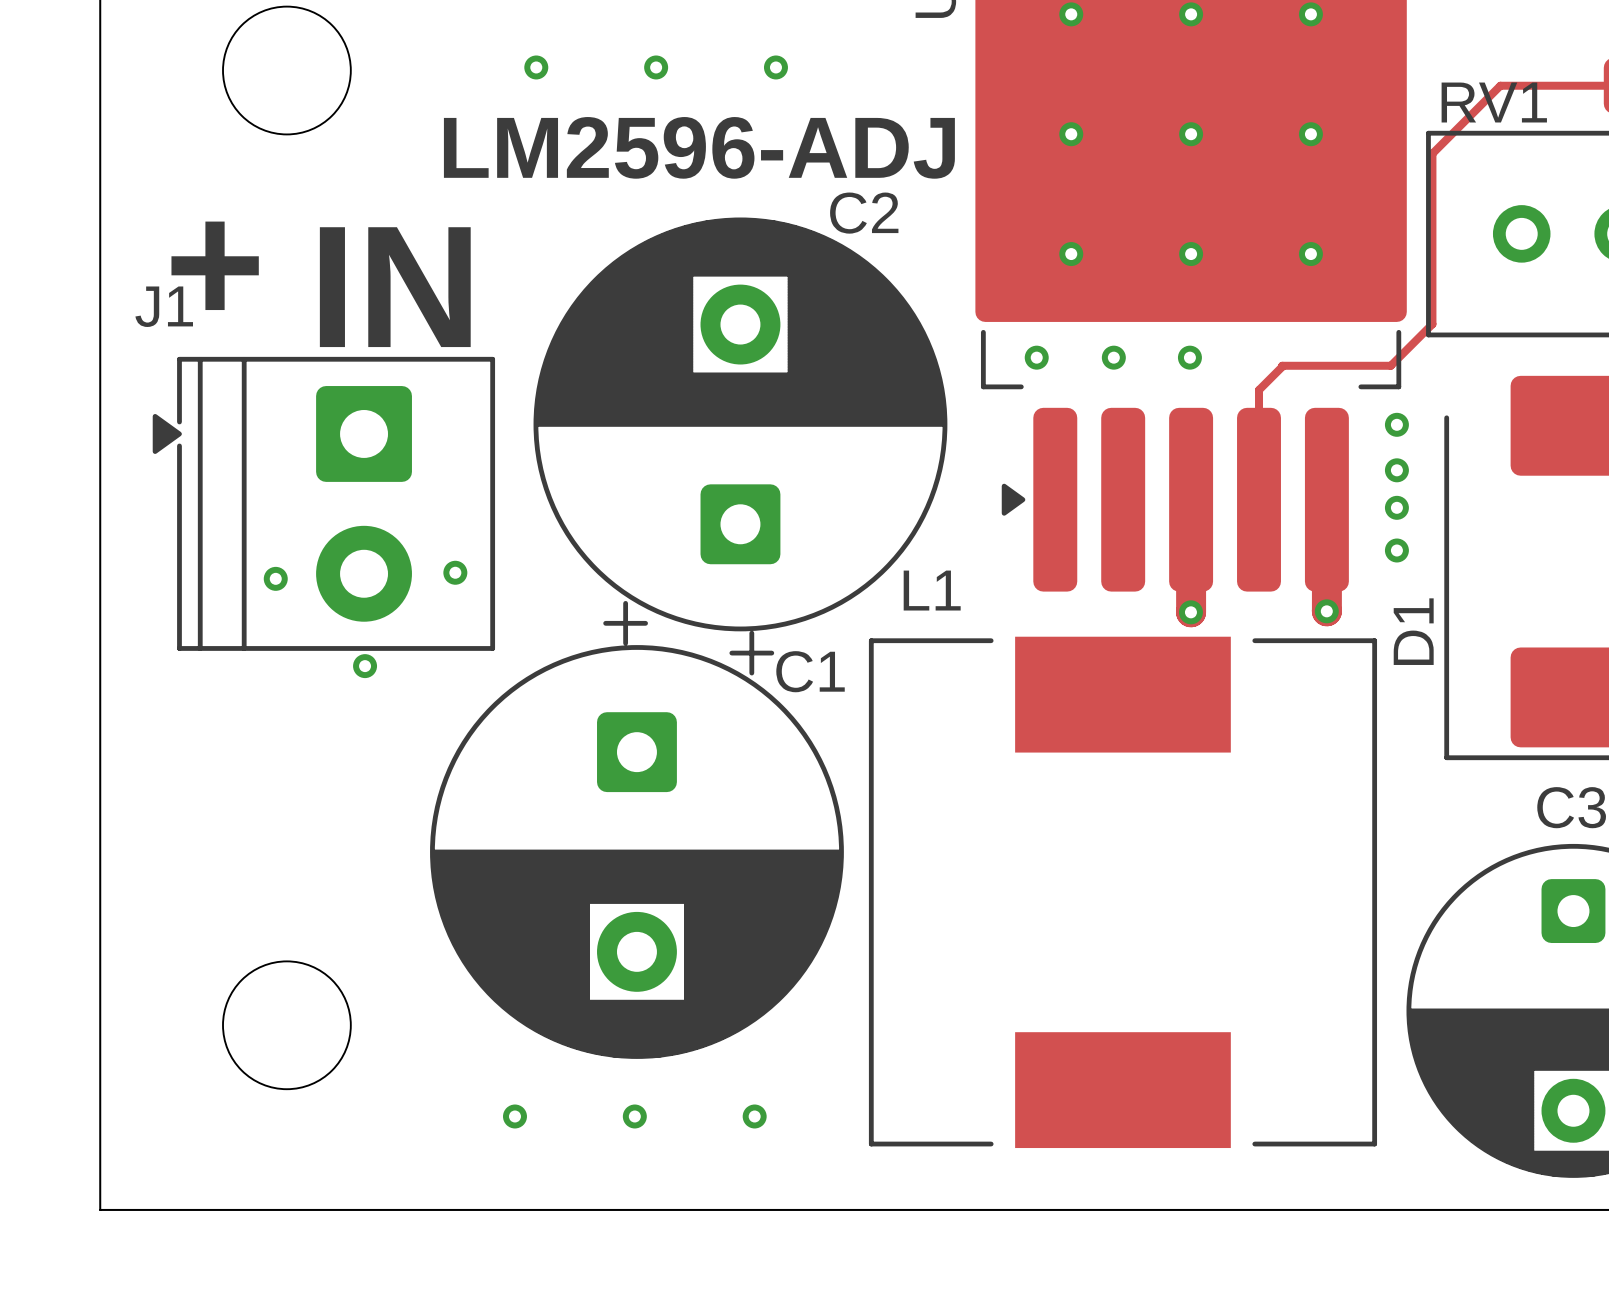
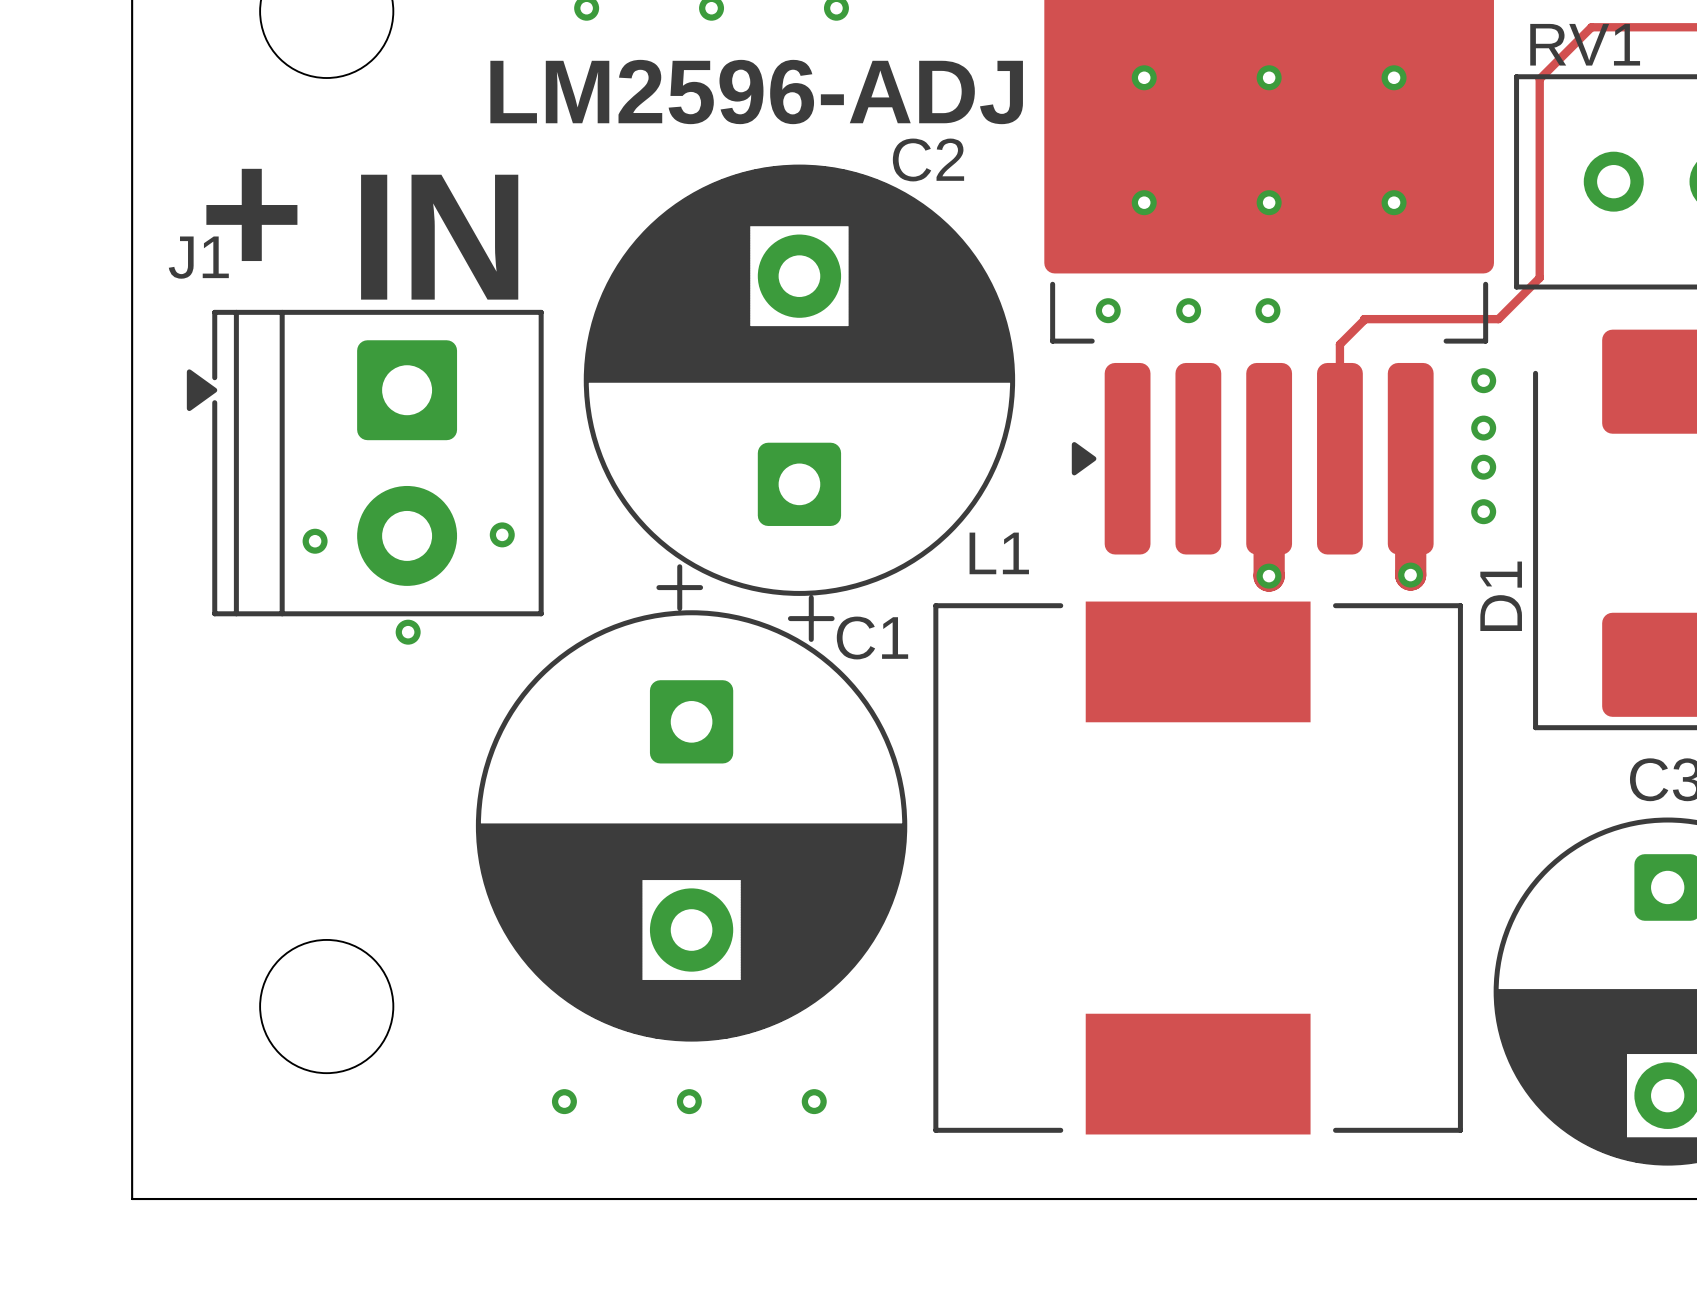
track: (1450, 135) (1432, 153) (1432, 324) (1390, 365) -> (1539, 79) (1539, 277) (1498, 319) (1477, 319)

